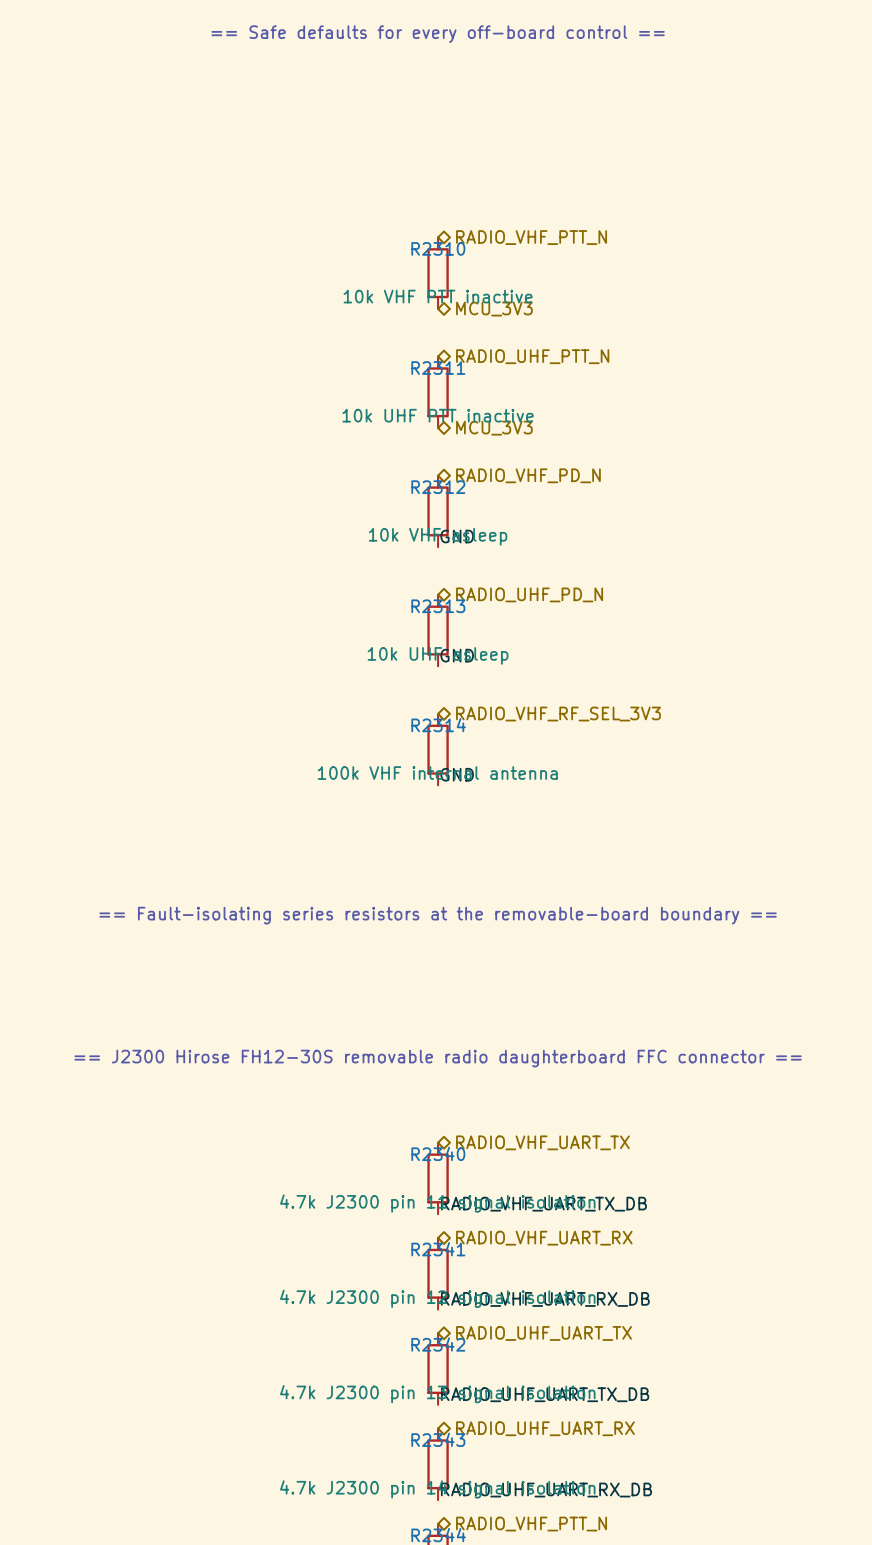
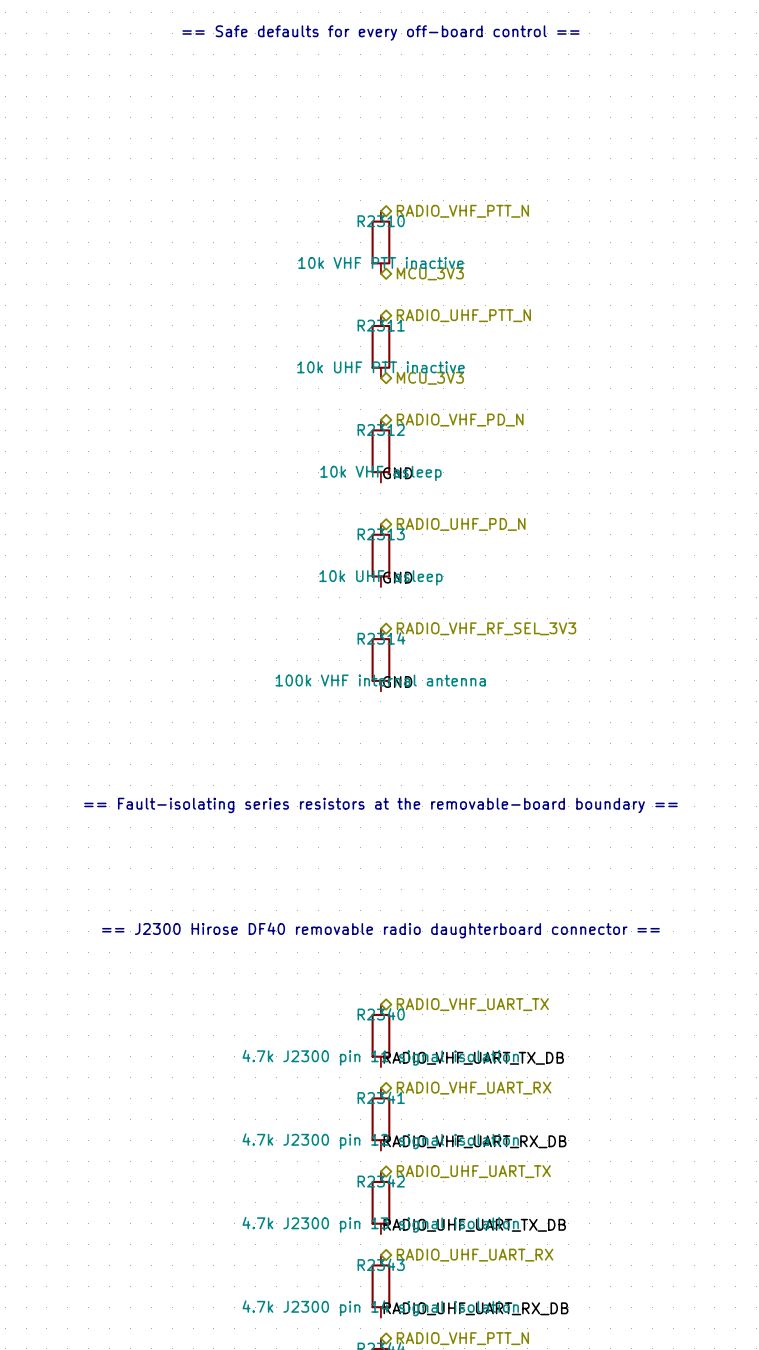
text: == J2300 Hirose FH12-30S removable radio daughterboard FFC connector == (438, 1058) -> == J2300 Hirose DF40 removable radio daughterboard connector == (380, 930)

